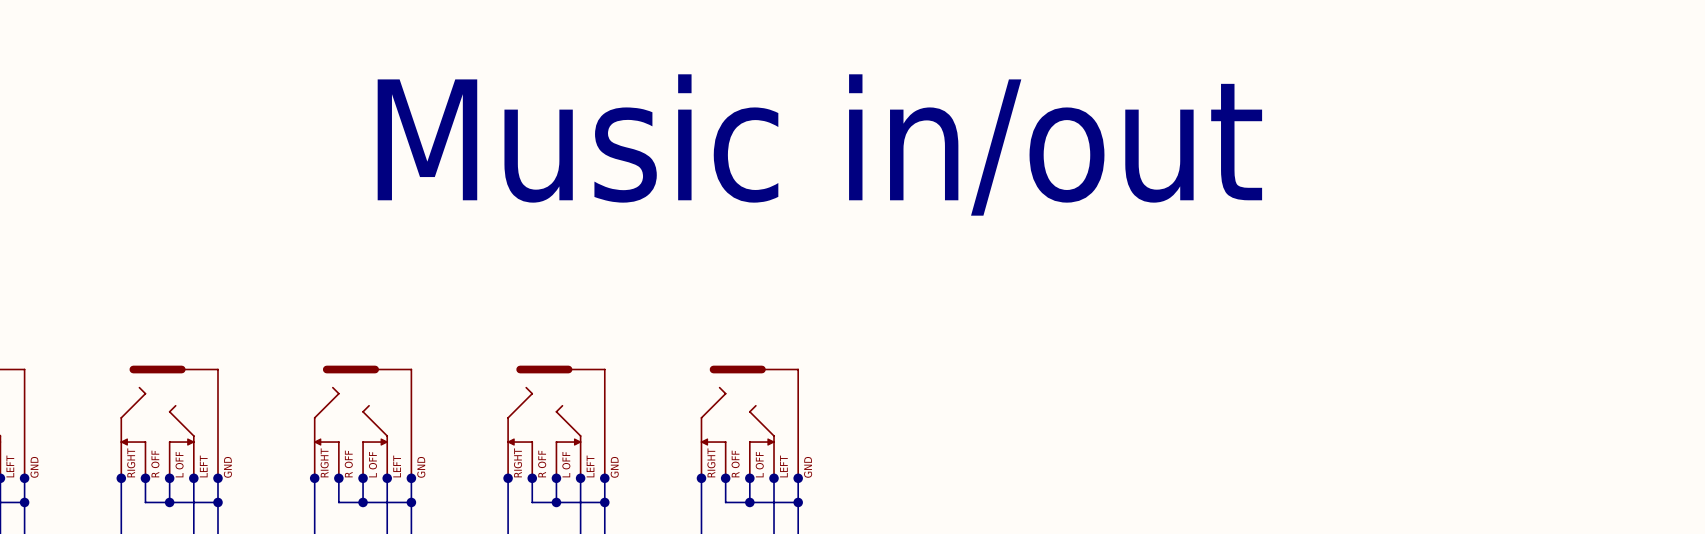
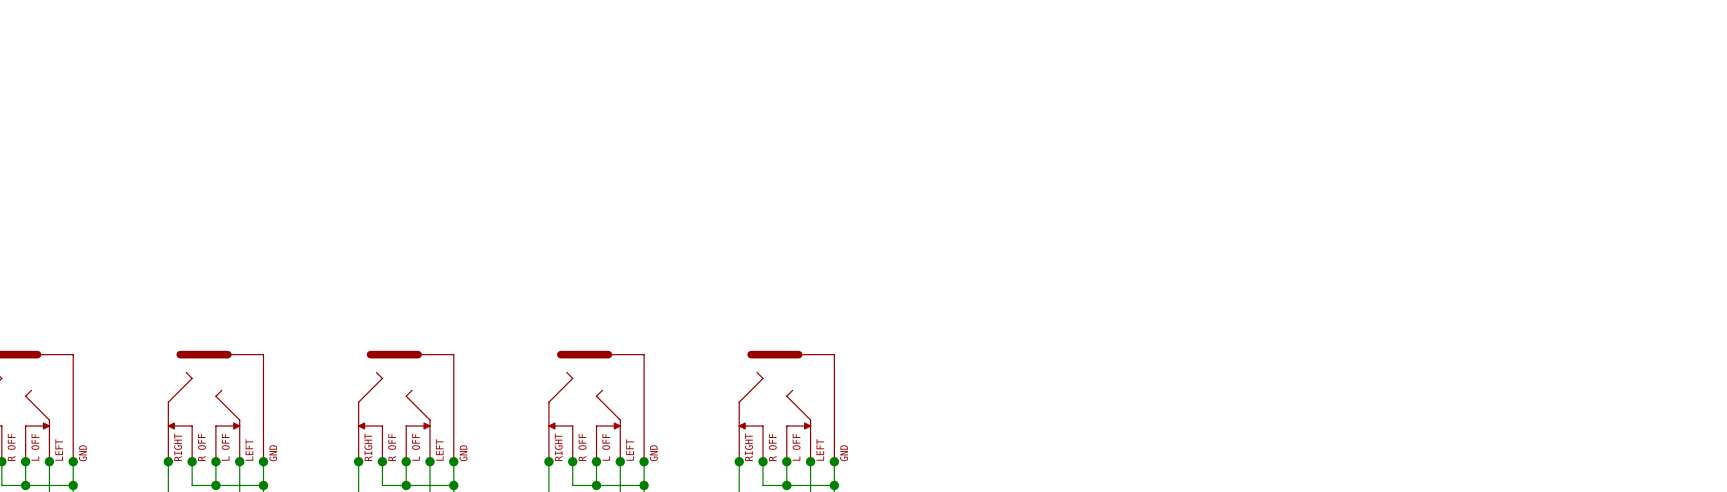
text: Music in/out (819, 144) -> none

